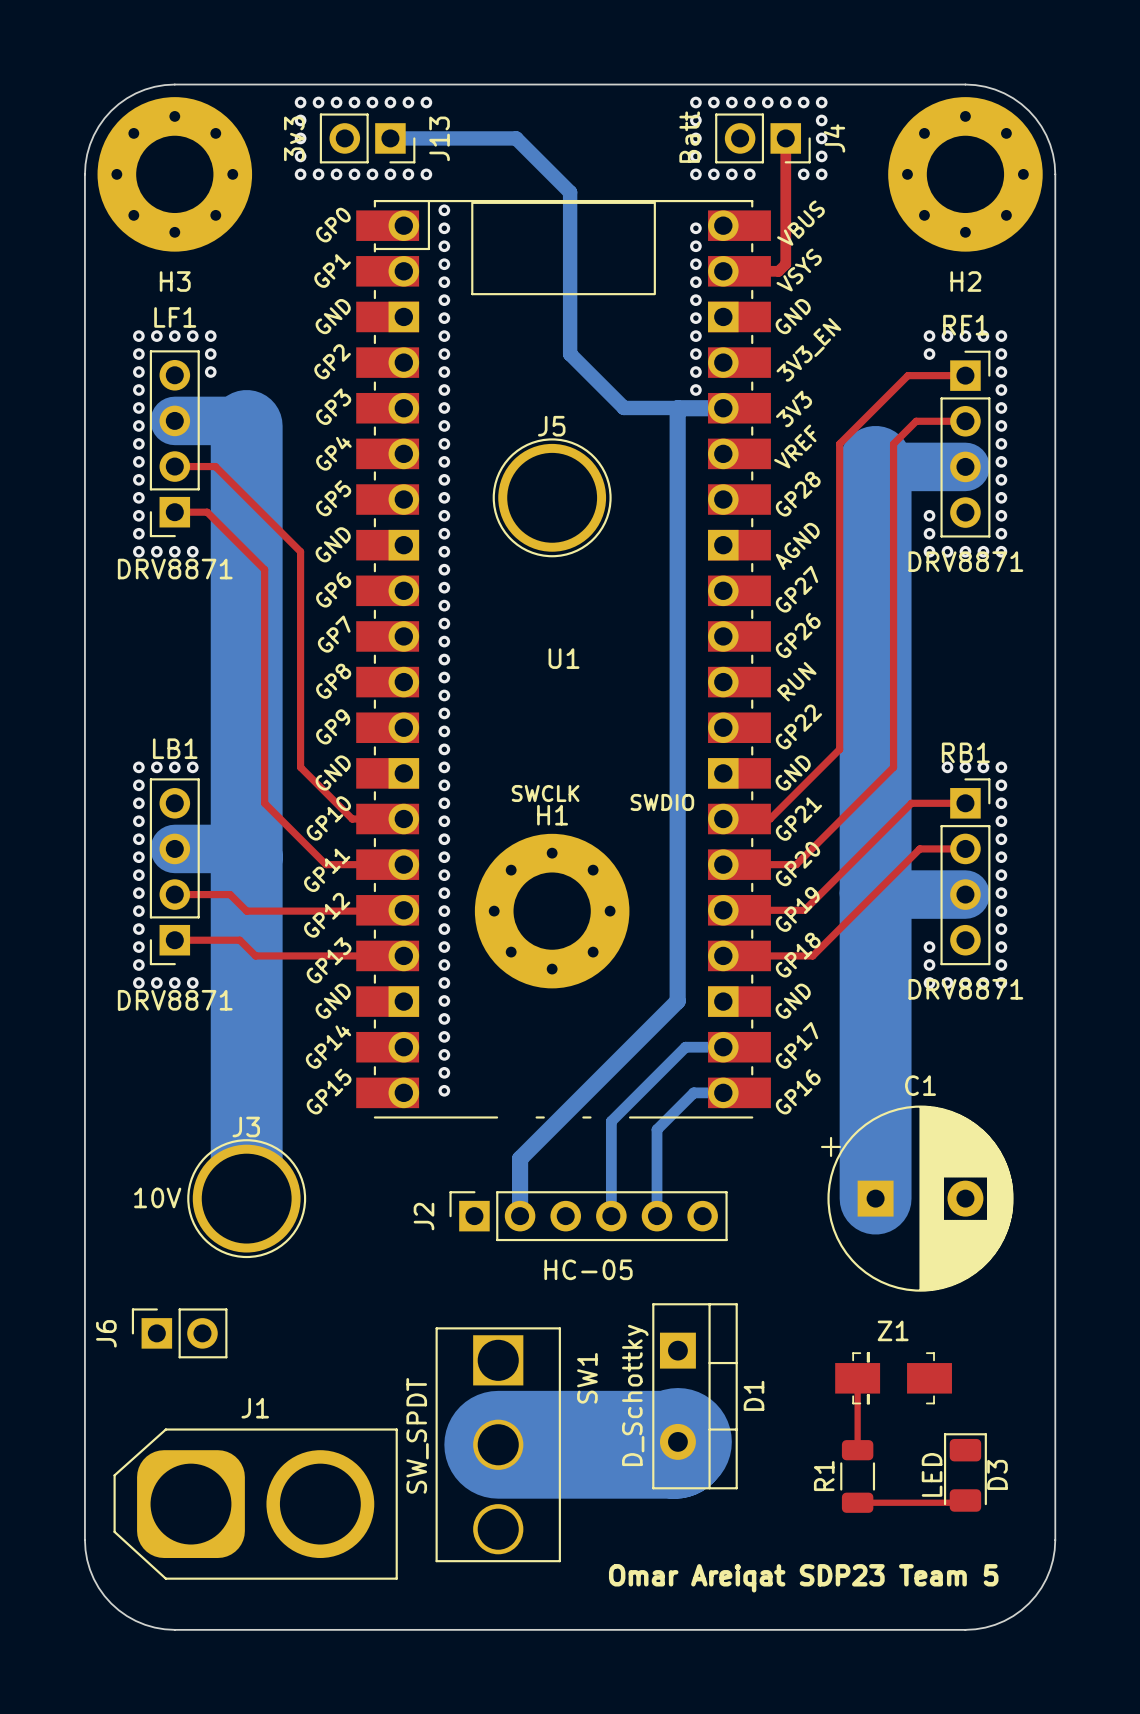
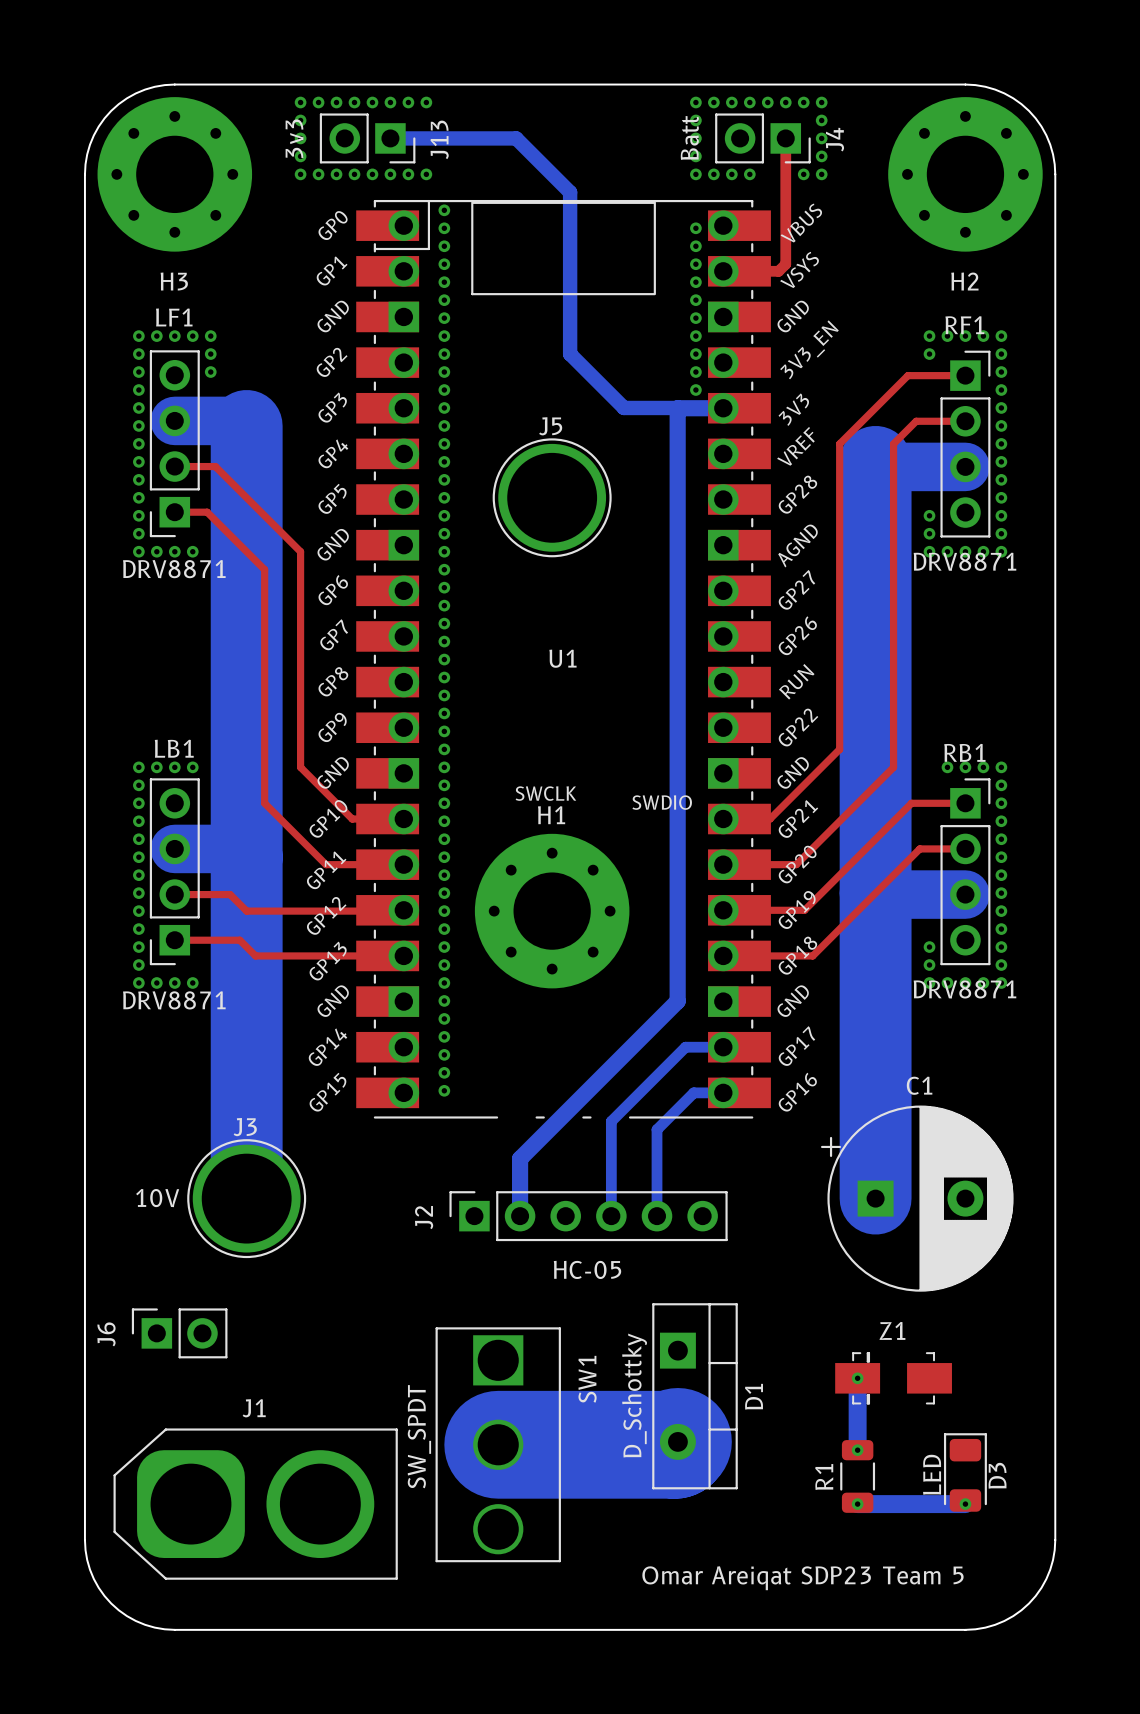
top track: (857, 1378) (857, 1450) -> none
bottom track: none -> (857, 1378) (857, 1450)
via: none -> (857, 1378)
via: none -> (857, 1450)
top track: (965, 1500) (963, 1502) (857, 1502) -> none
bottom track: none -> (857, 1504) (965, 1504)
via: none -> (857, 1504)
via: none -> (965, 1504)

